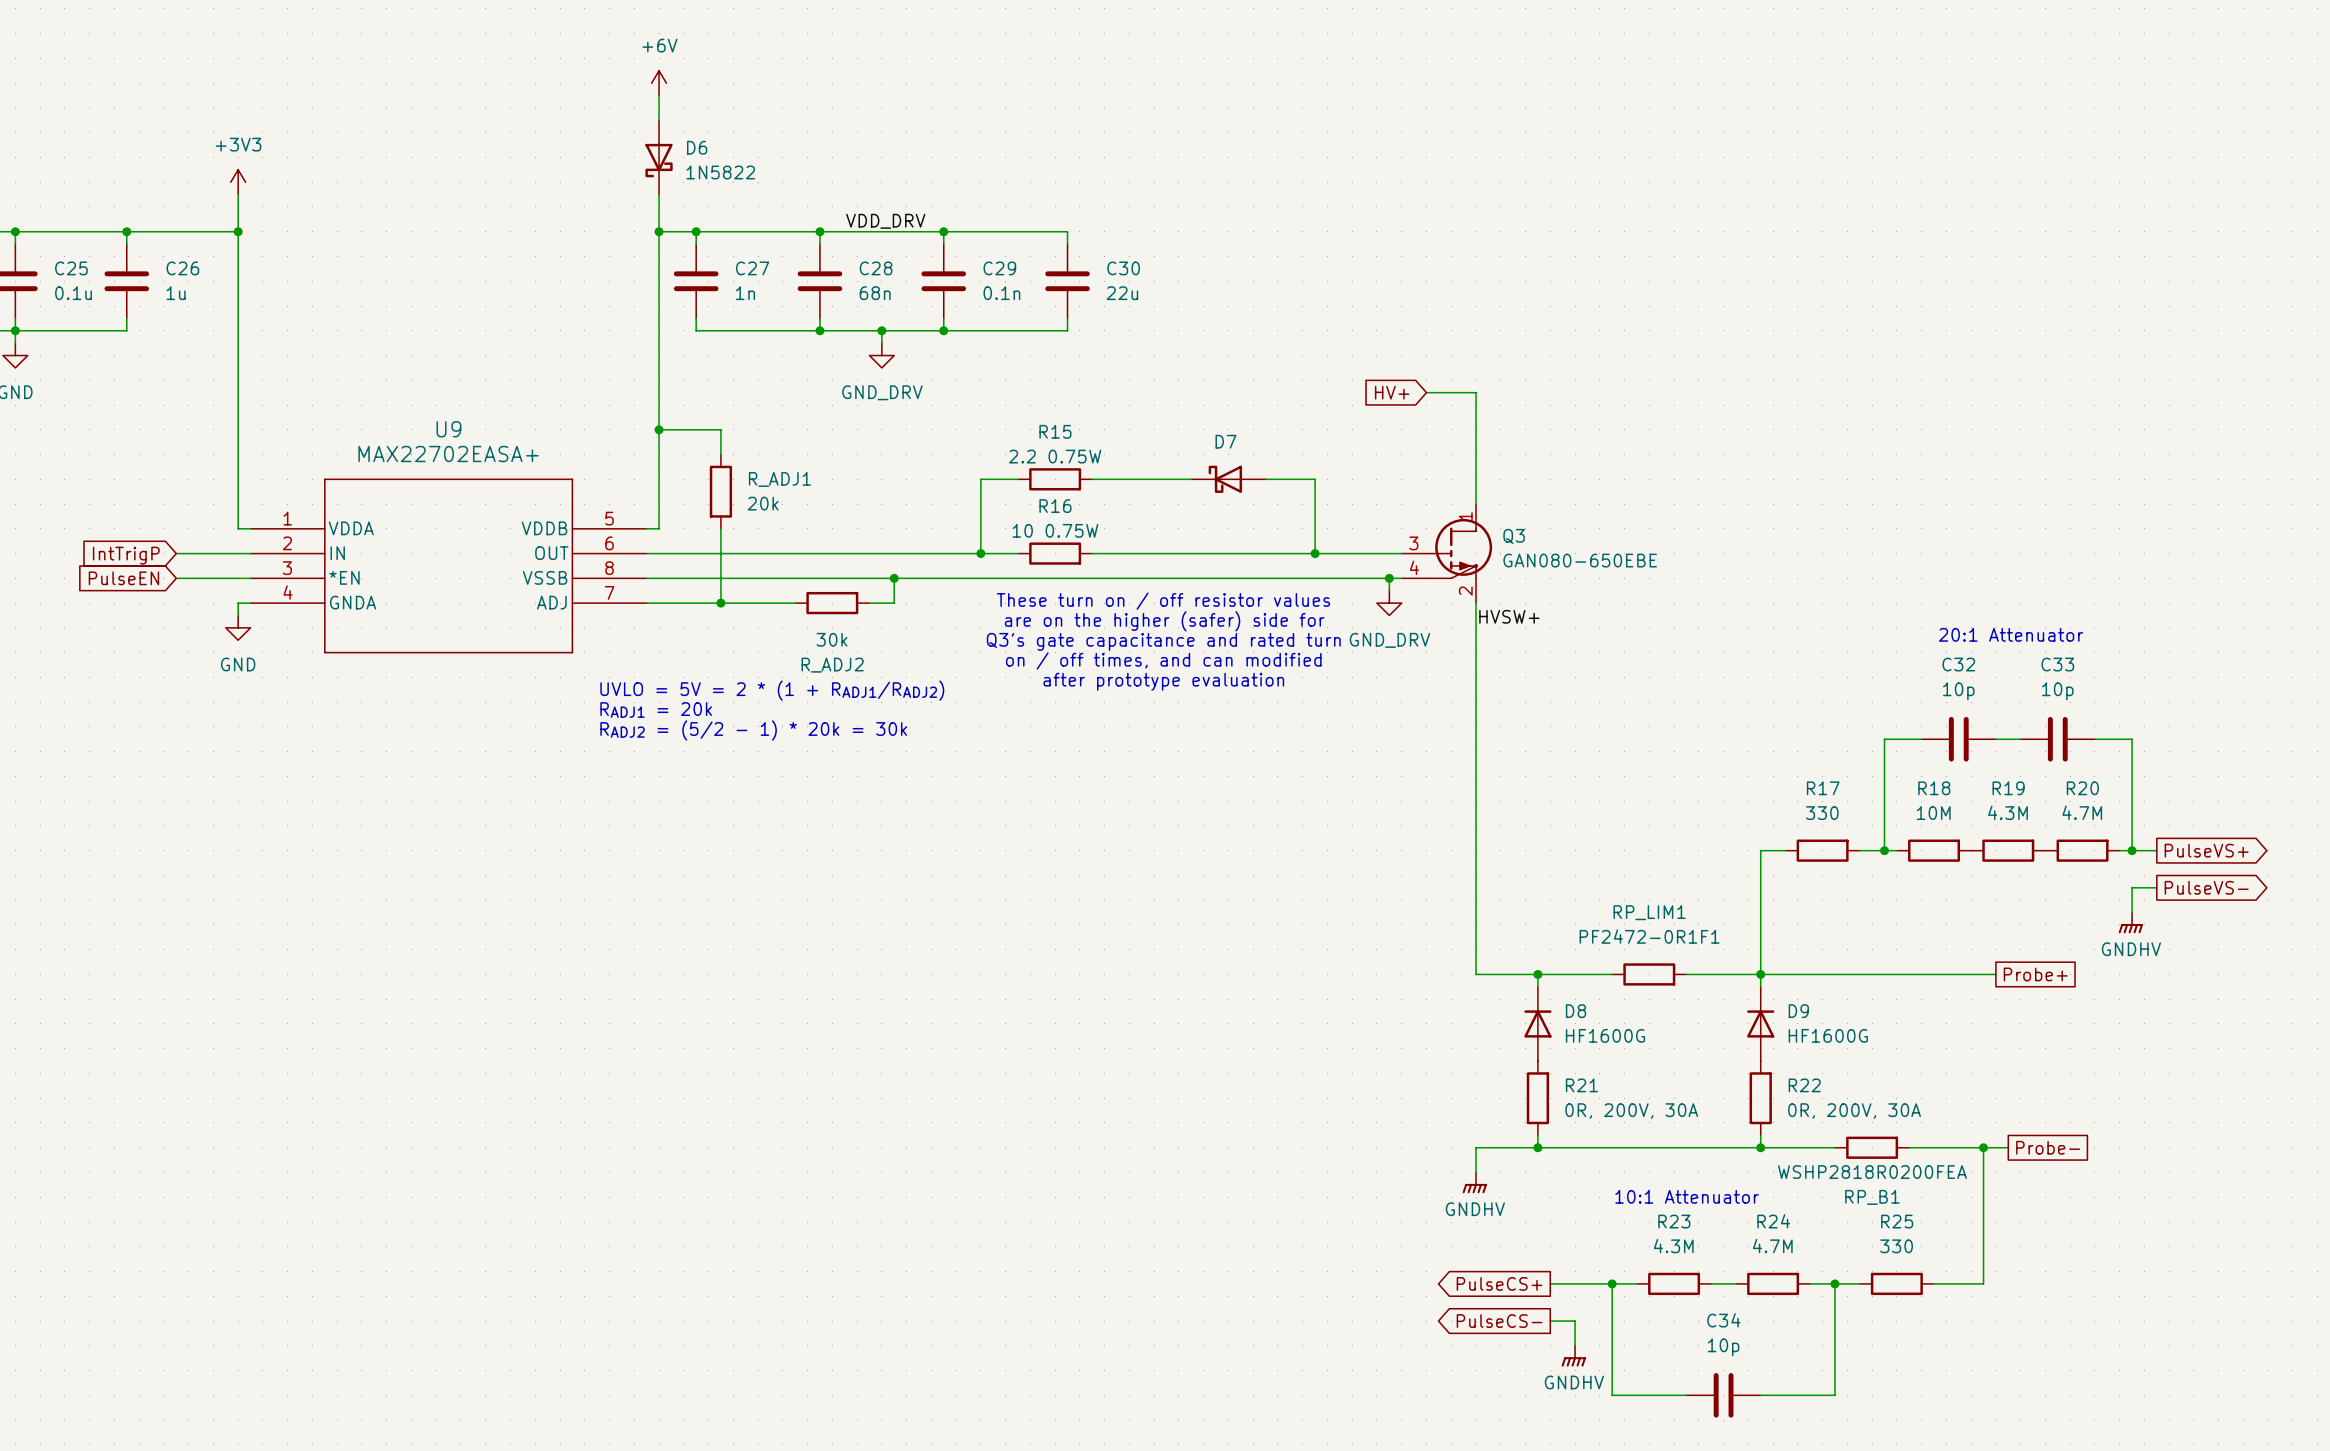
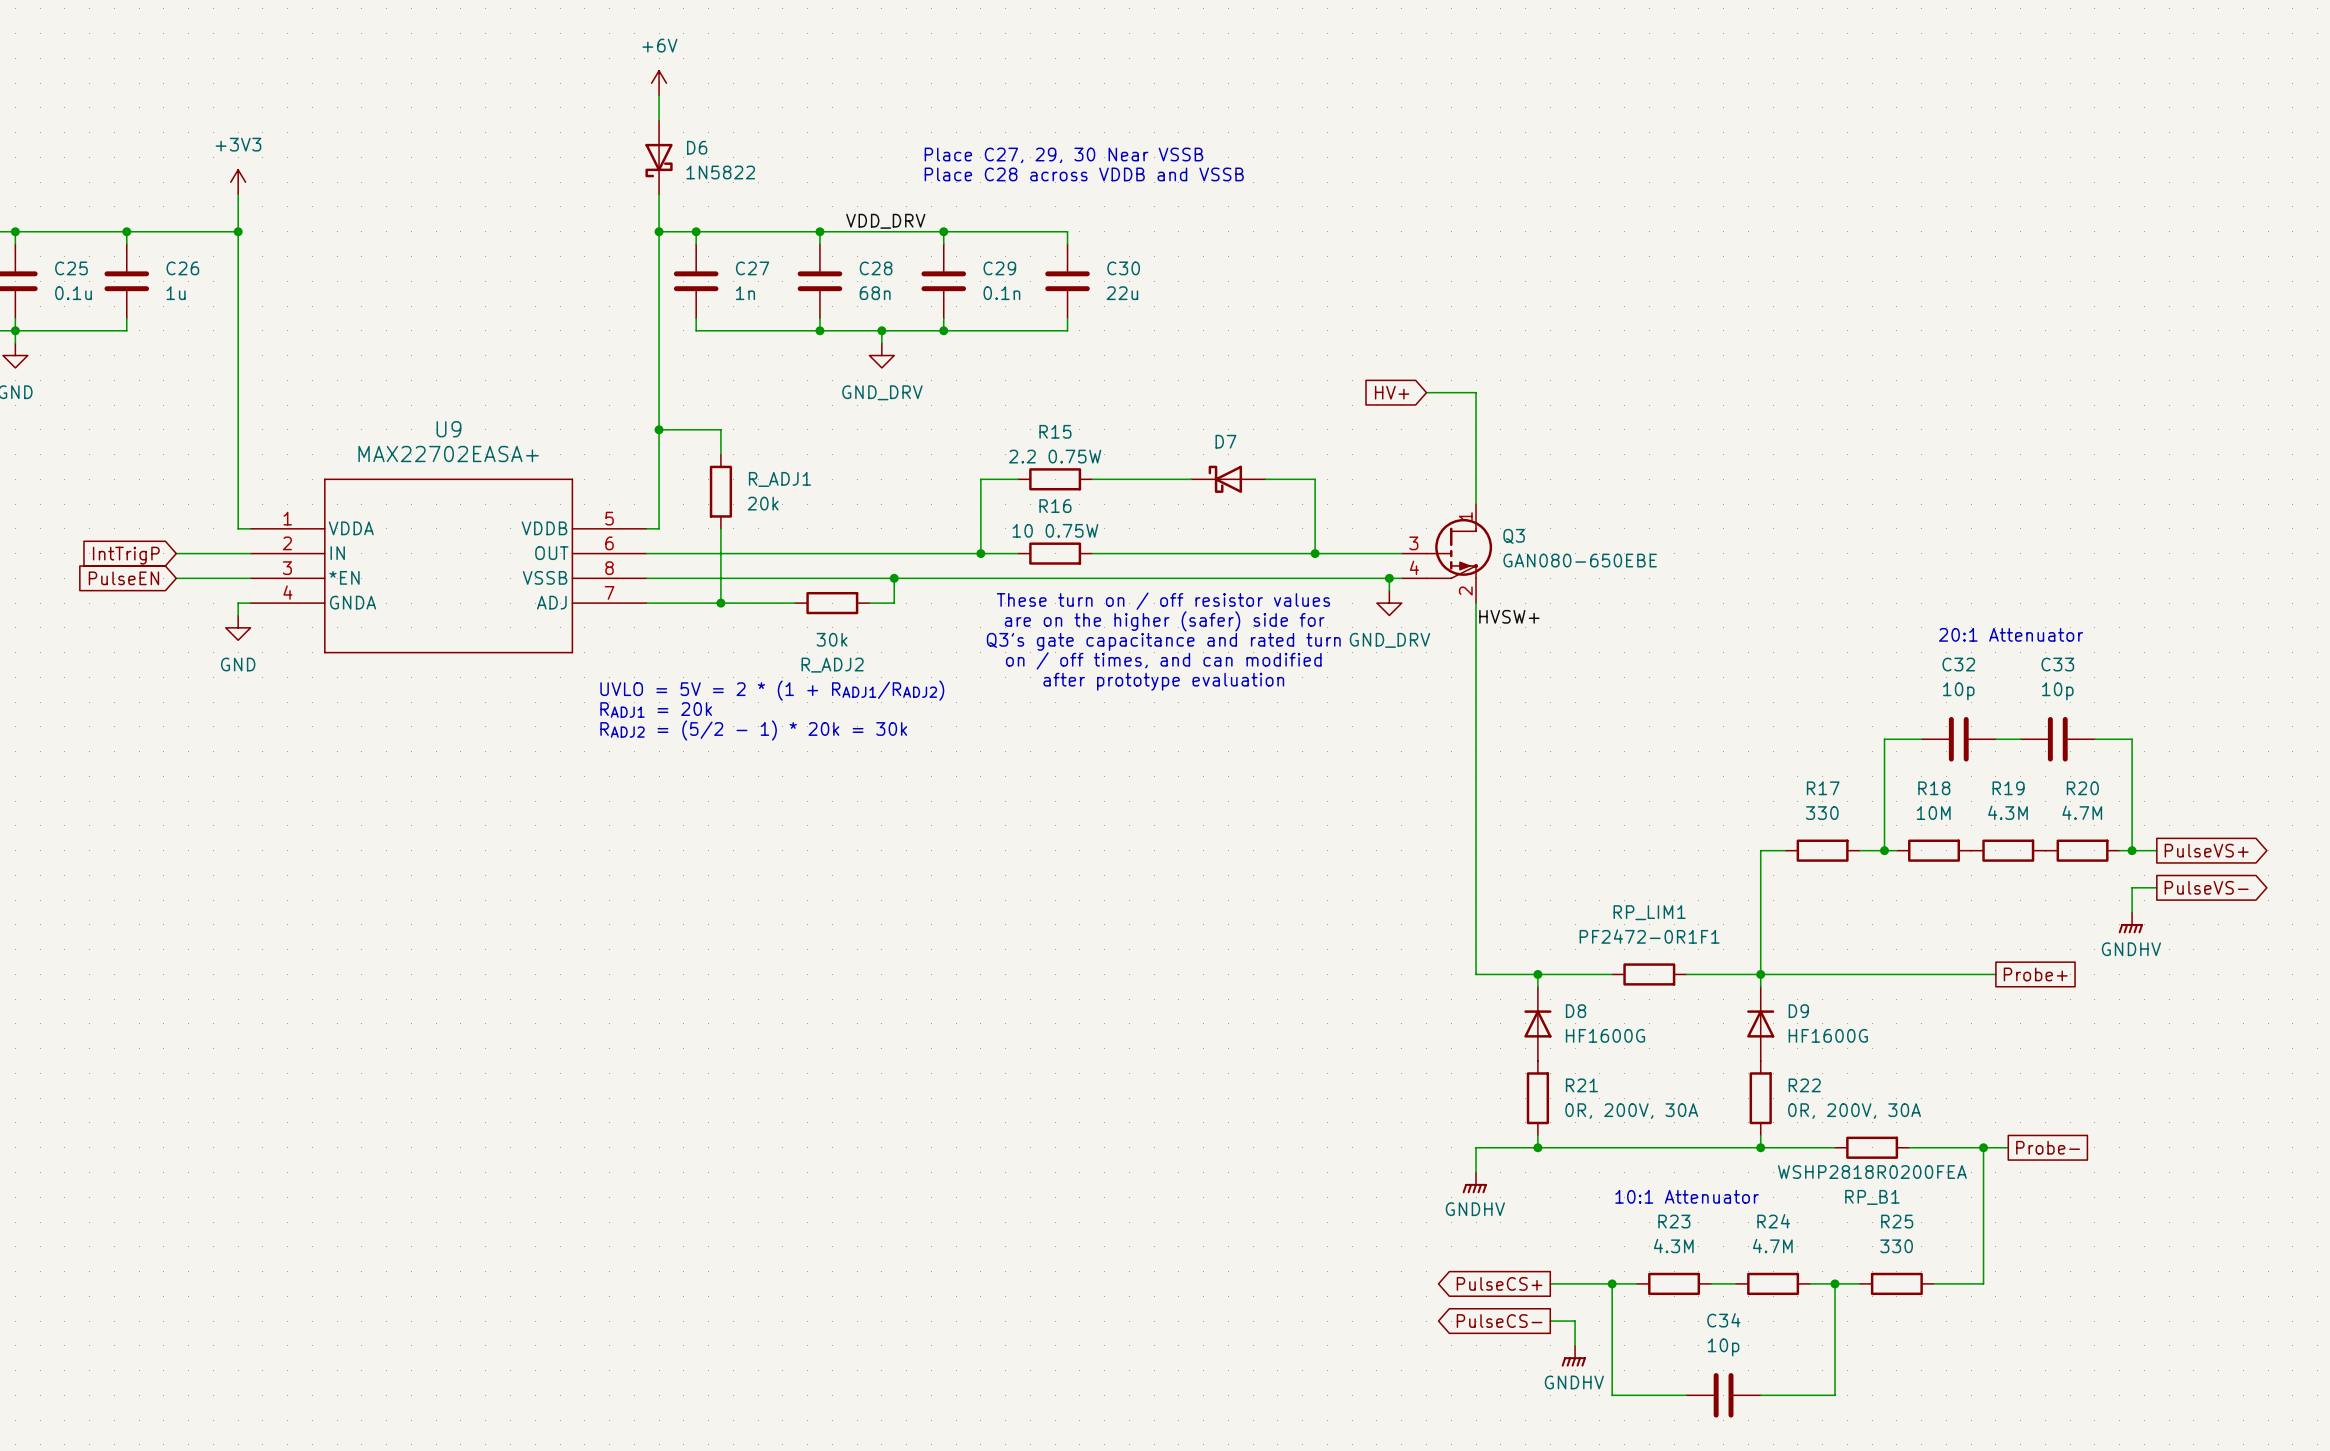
text: none -> Place C27, 29, 30 Near VSSB (1063, 155)
text: none -> Place C28 across VDDB and VSSB (1084, 174)

